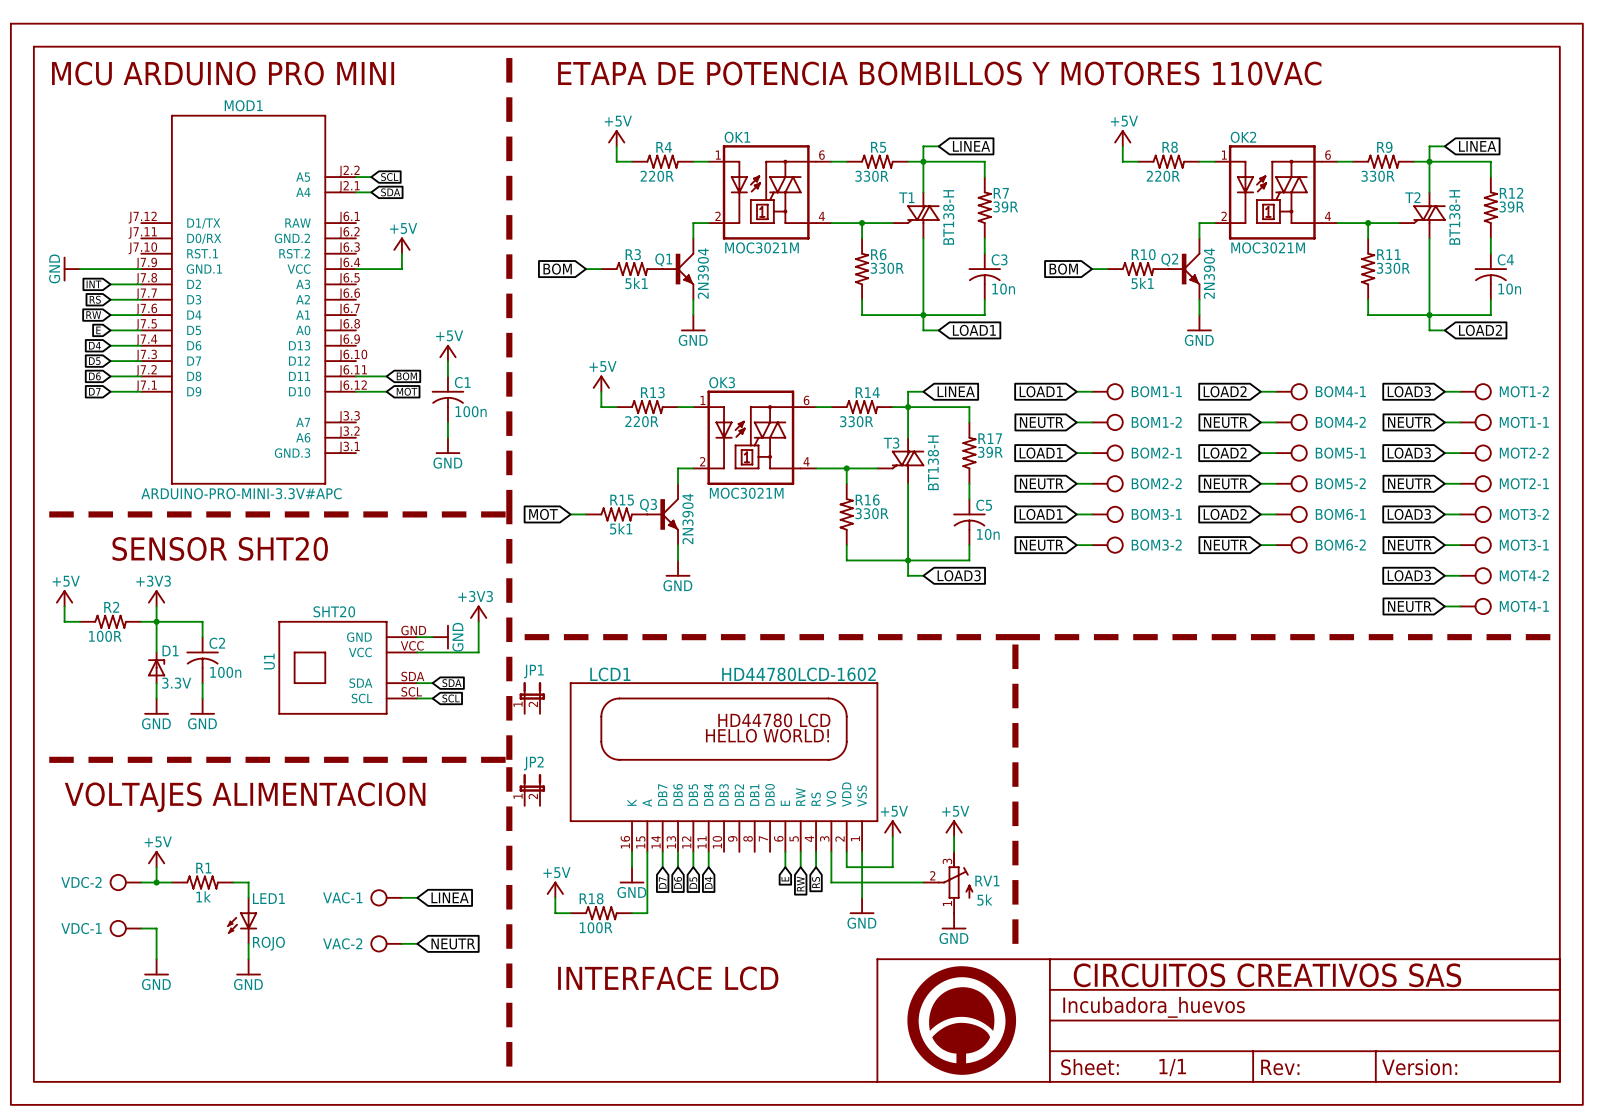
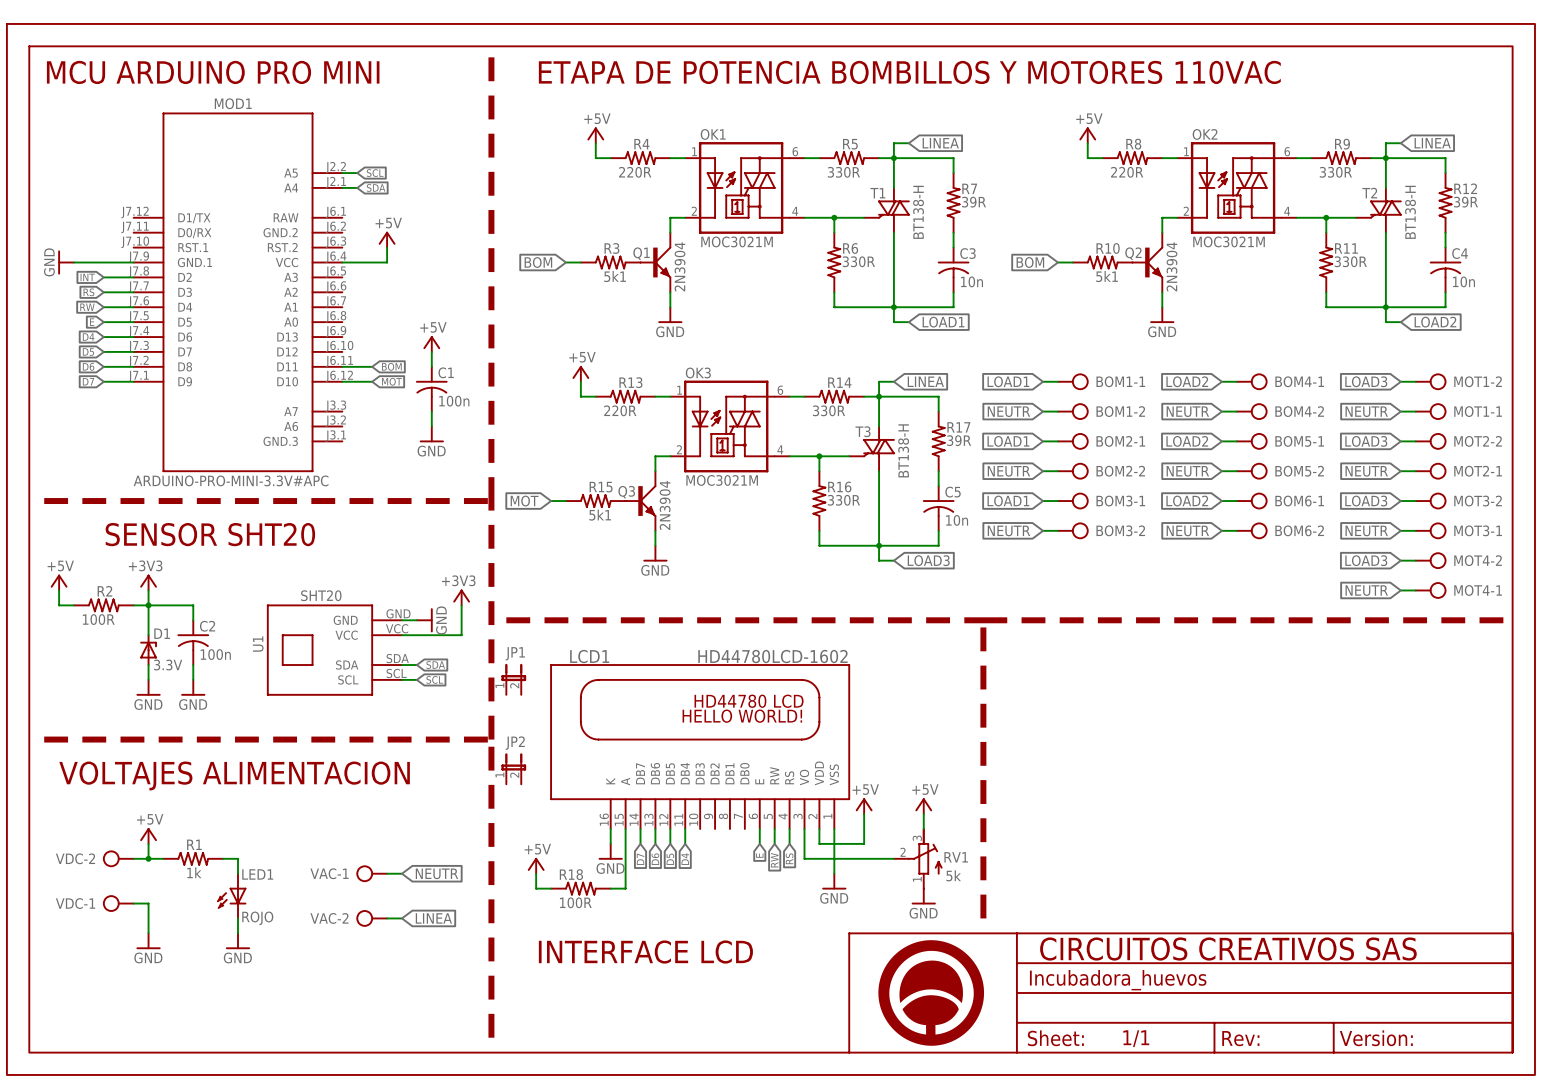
global label: LINEA (450, 897) -> NEUTR (436, 873)
global label: NEUTR (453, 943) -> LINEA (433, 918)

